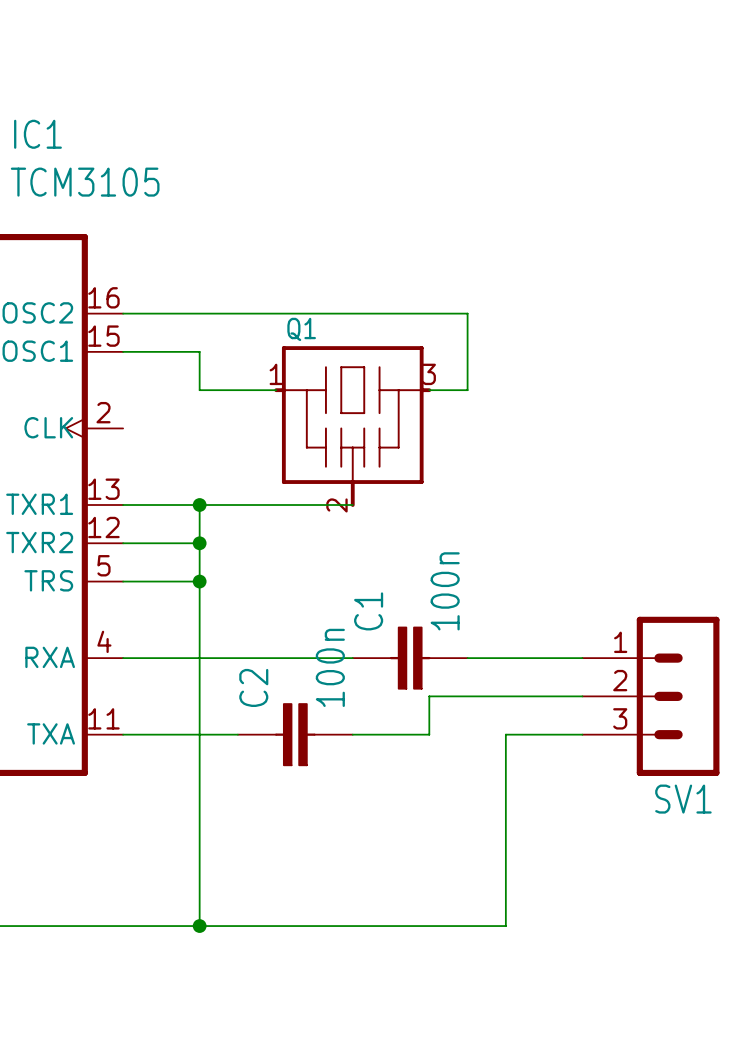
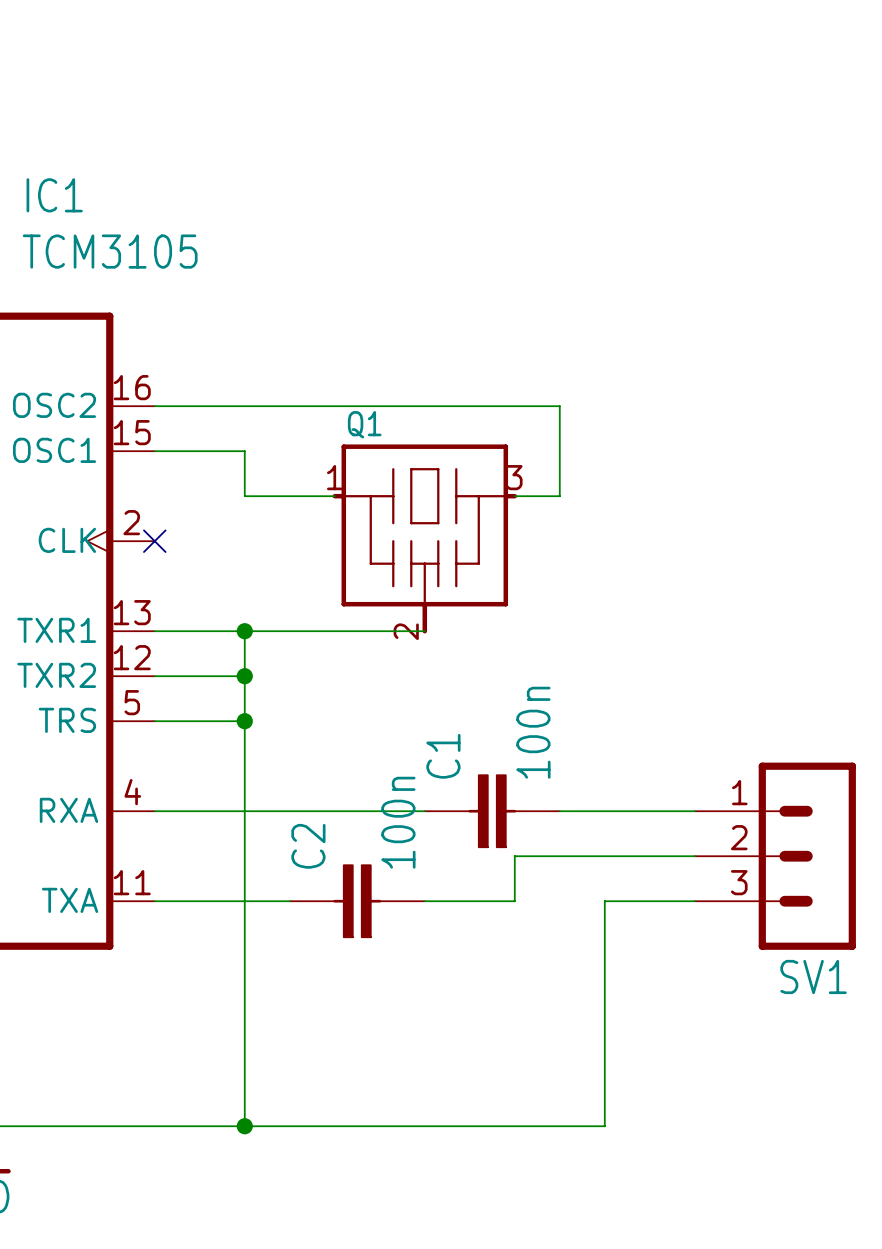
no-connect mark: none -> (154, 541)

